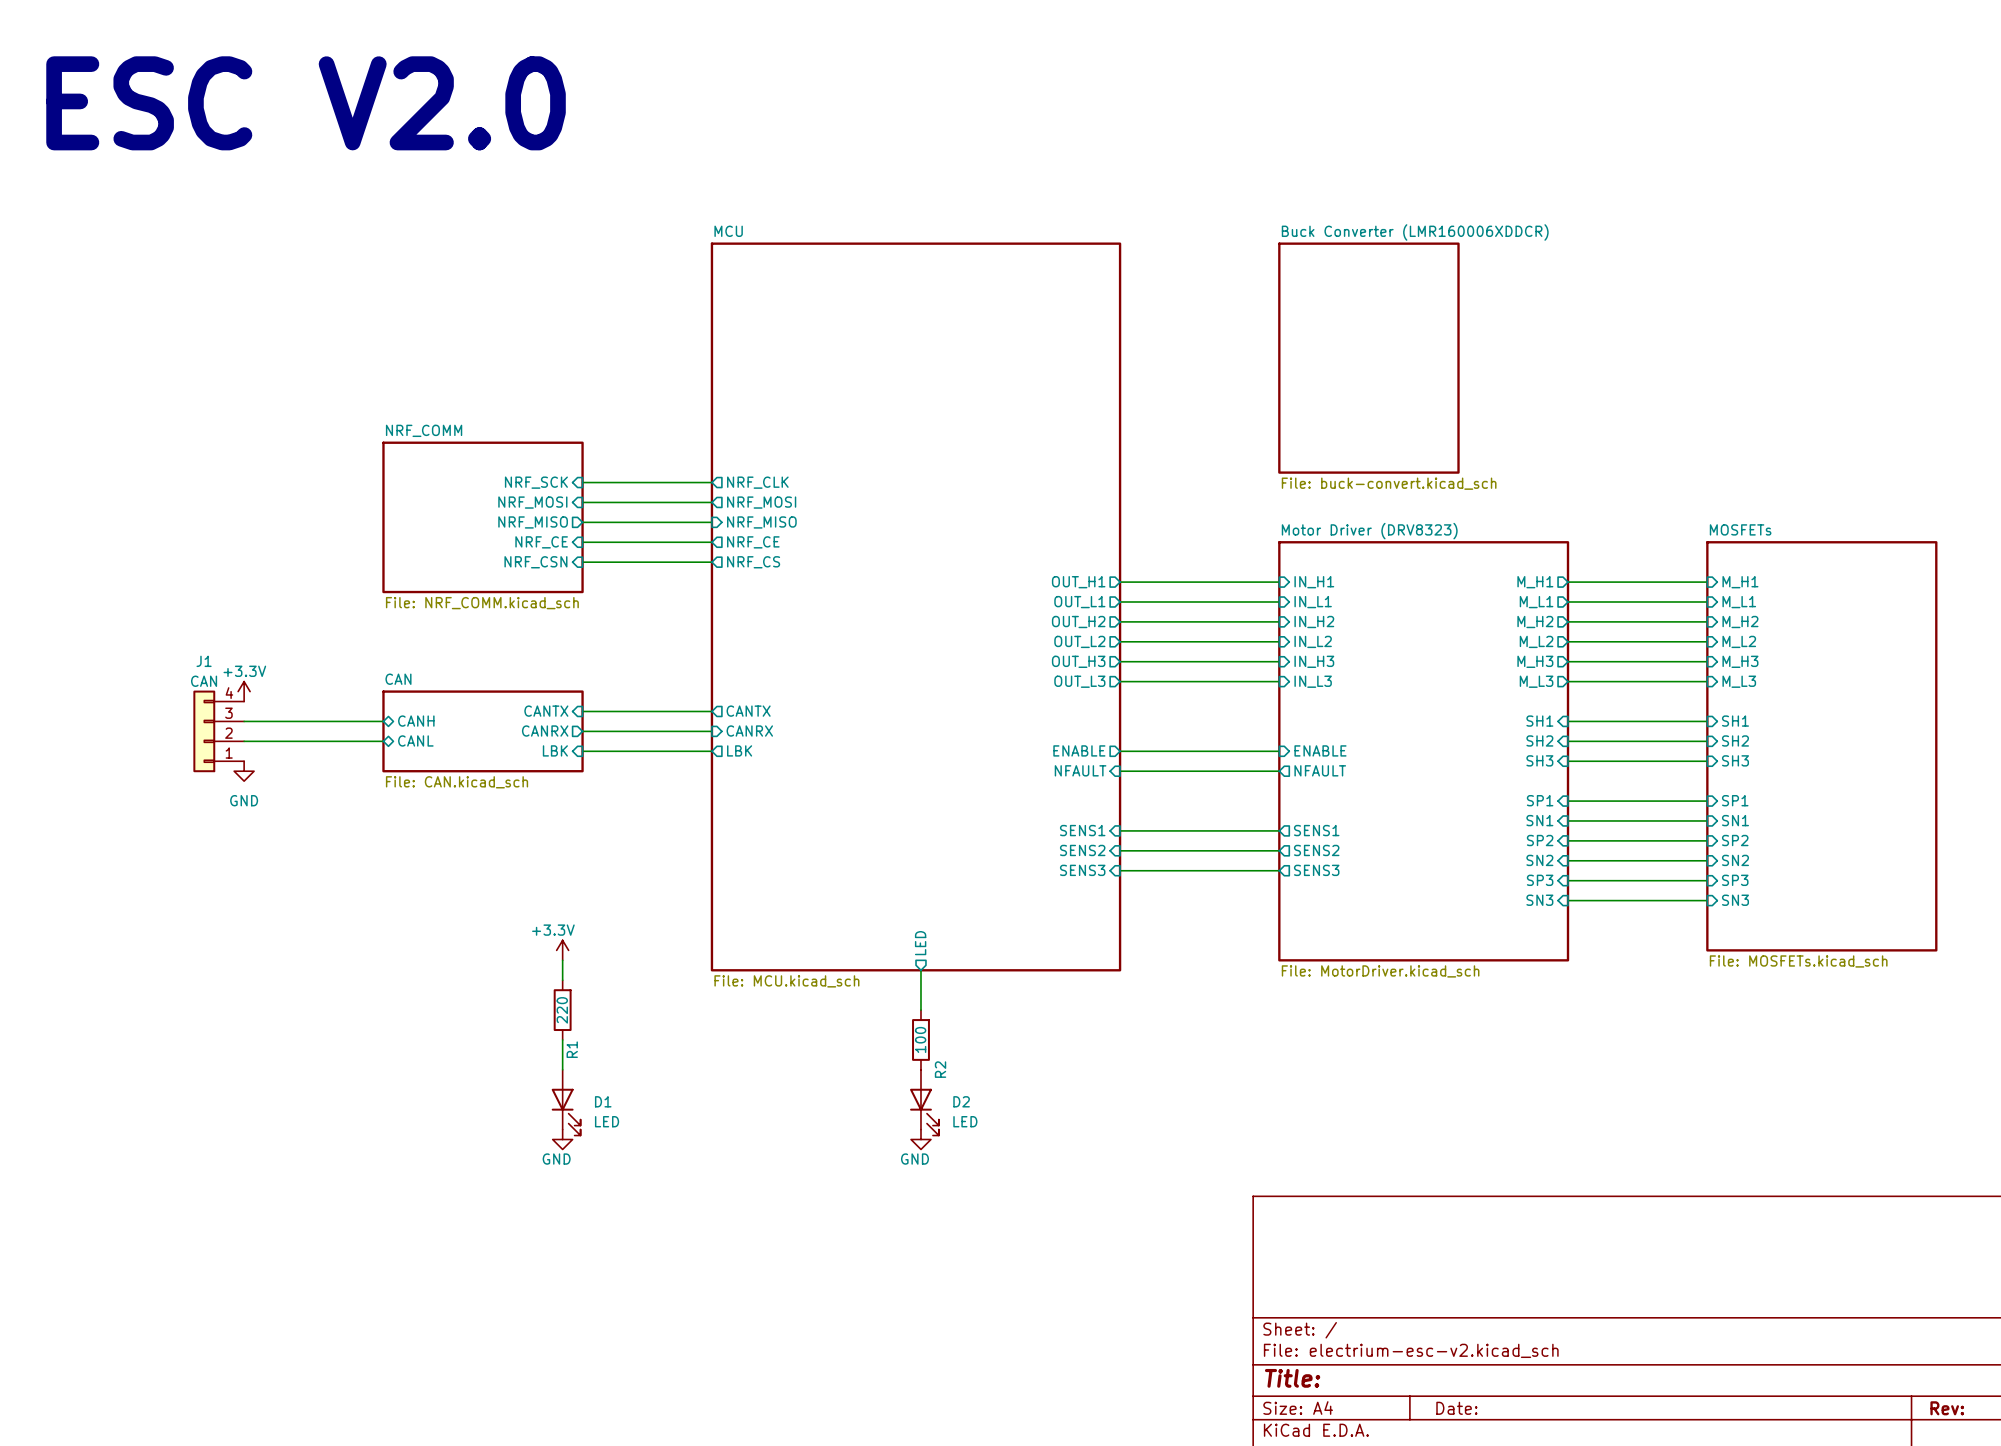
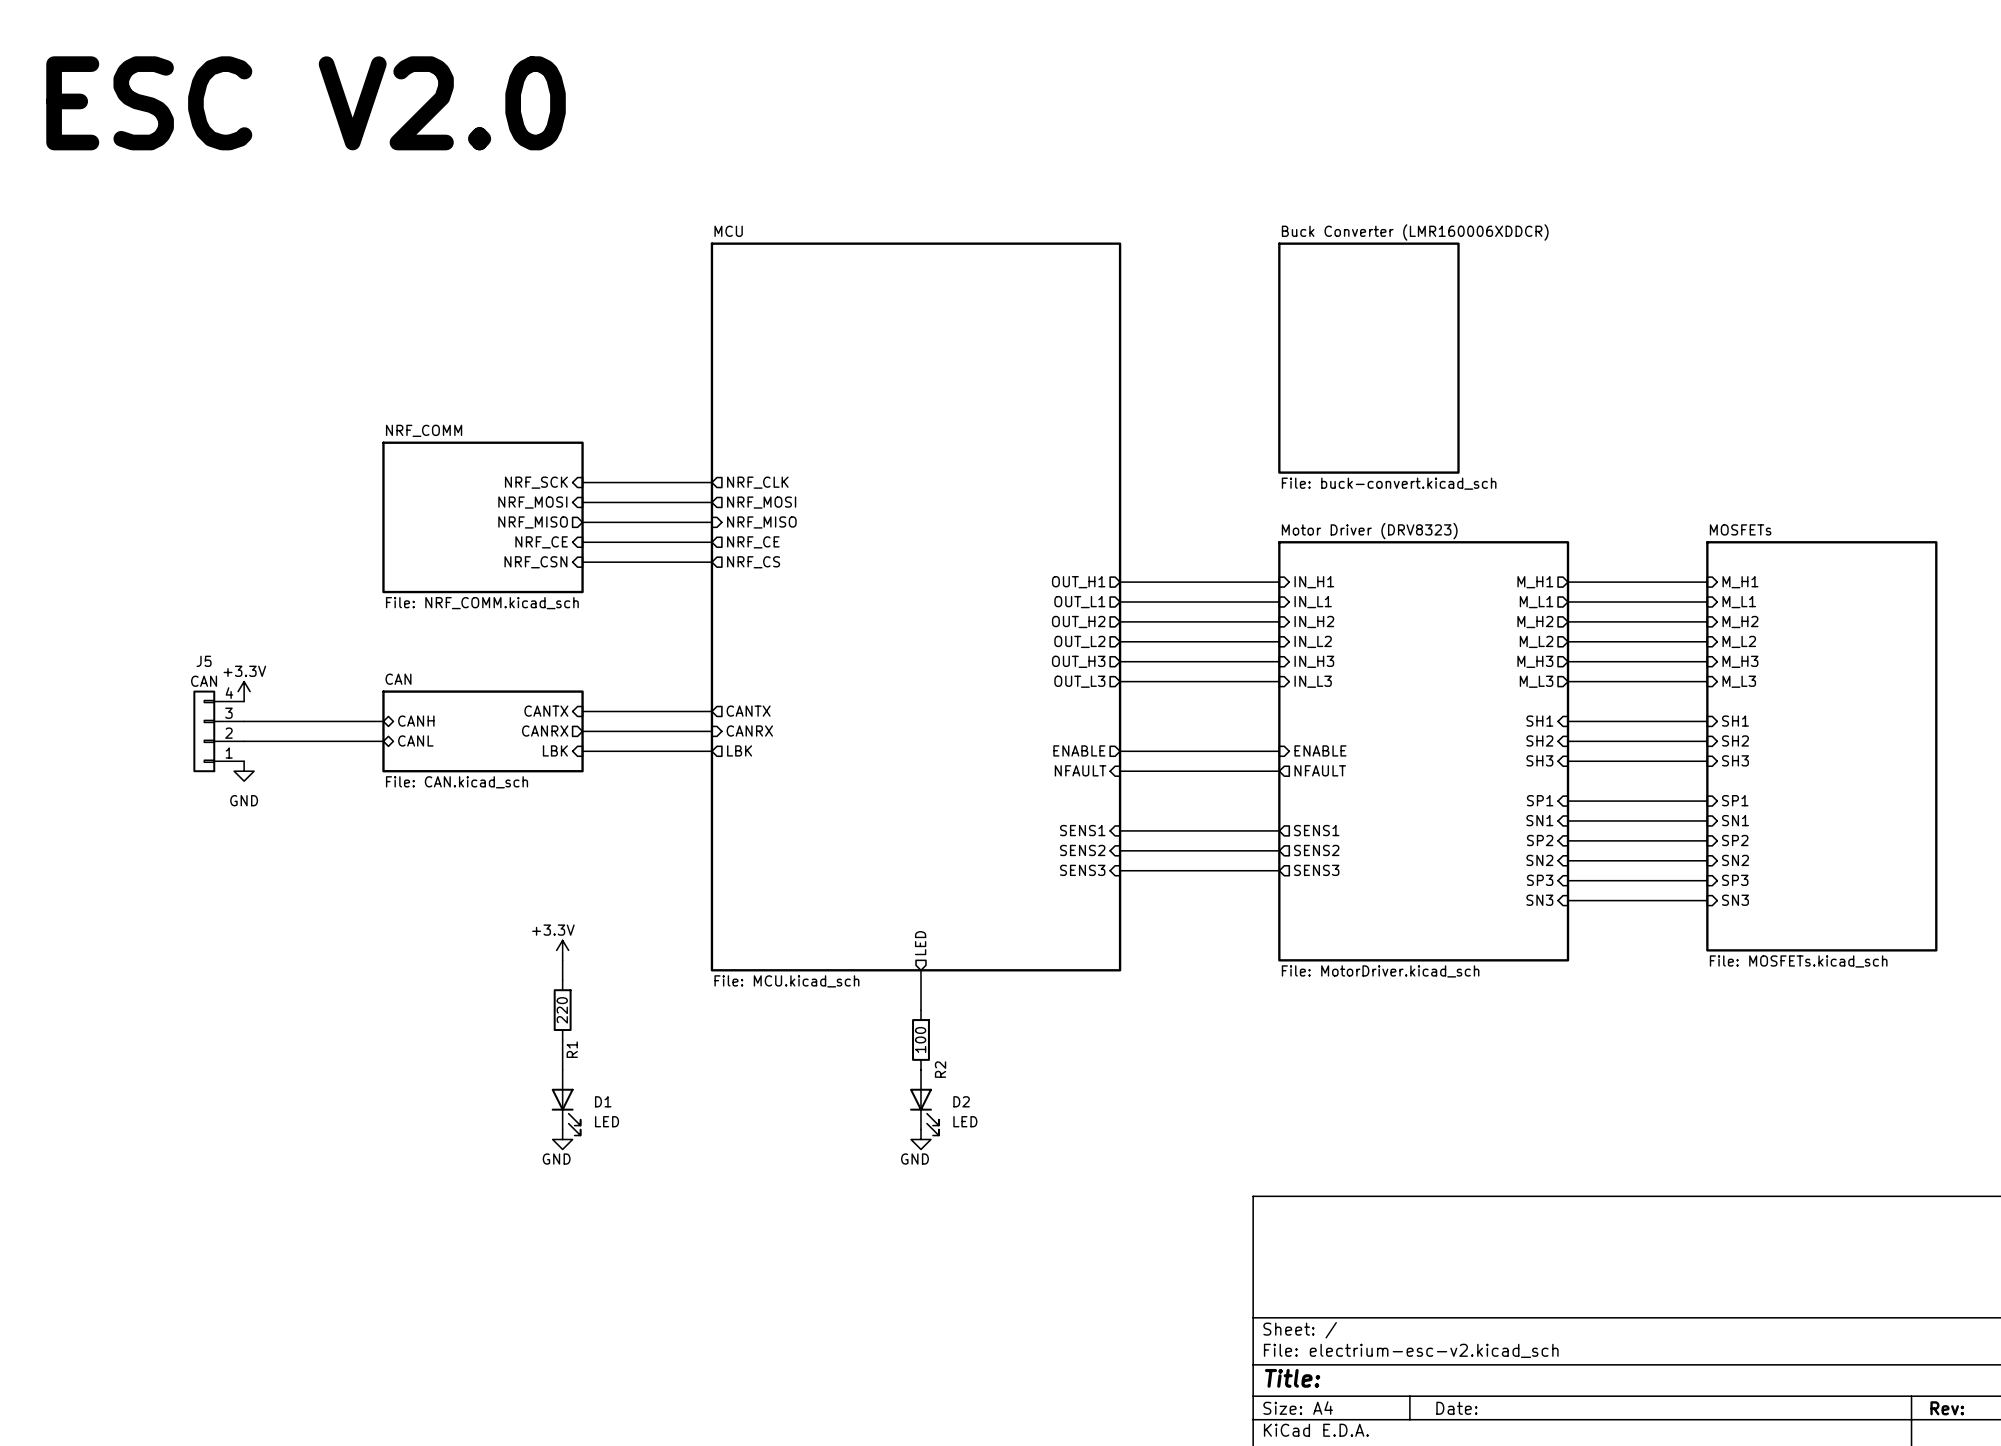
J1 name: J1 (204, 661) -> J5 (204, 661)

